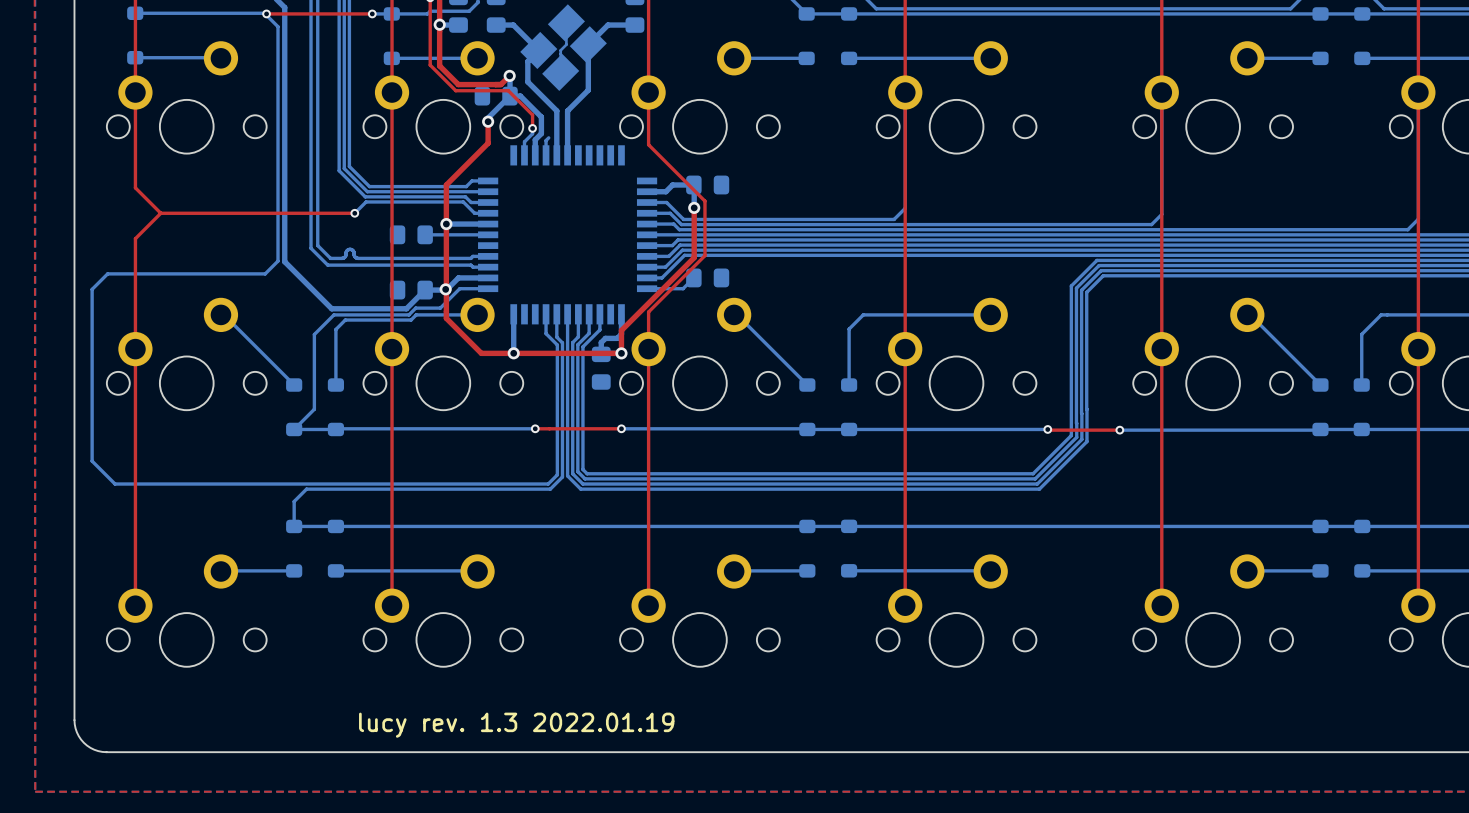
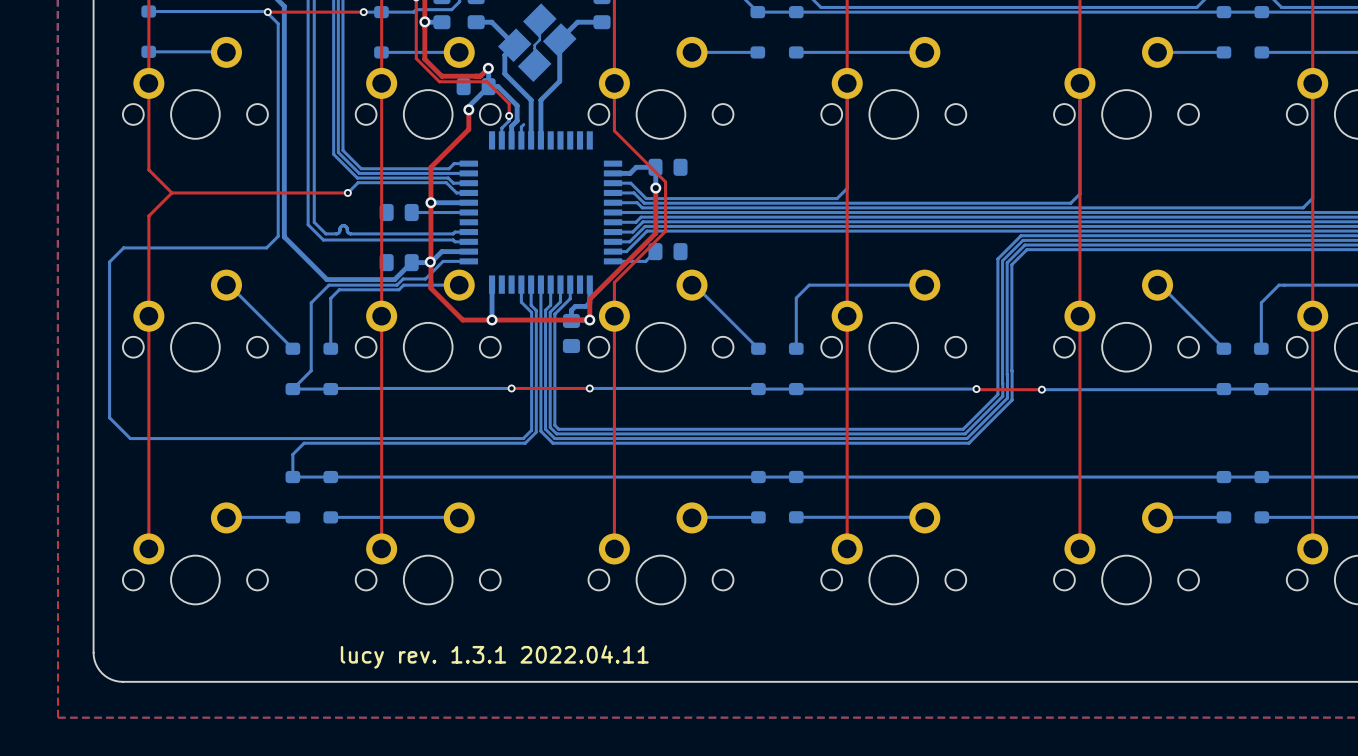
text: lucy rev. 1.3 2022.01.19 (516, 725) -> lucy rev. 1.3.1 2022.04.11 (494, 656)

